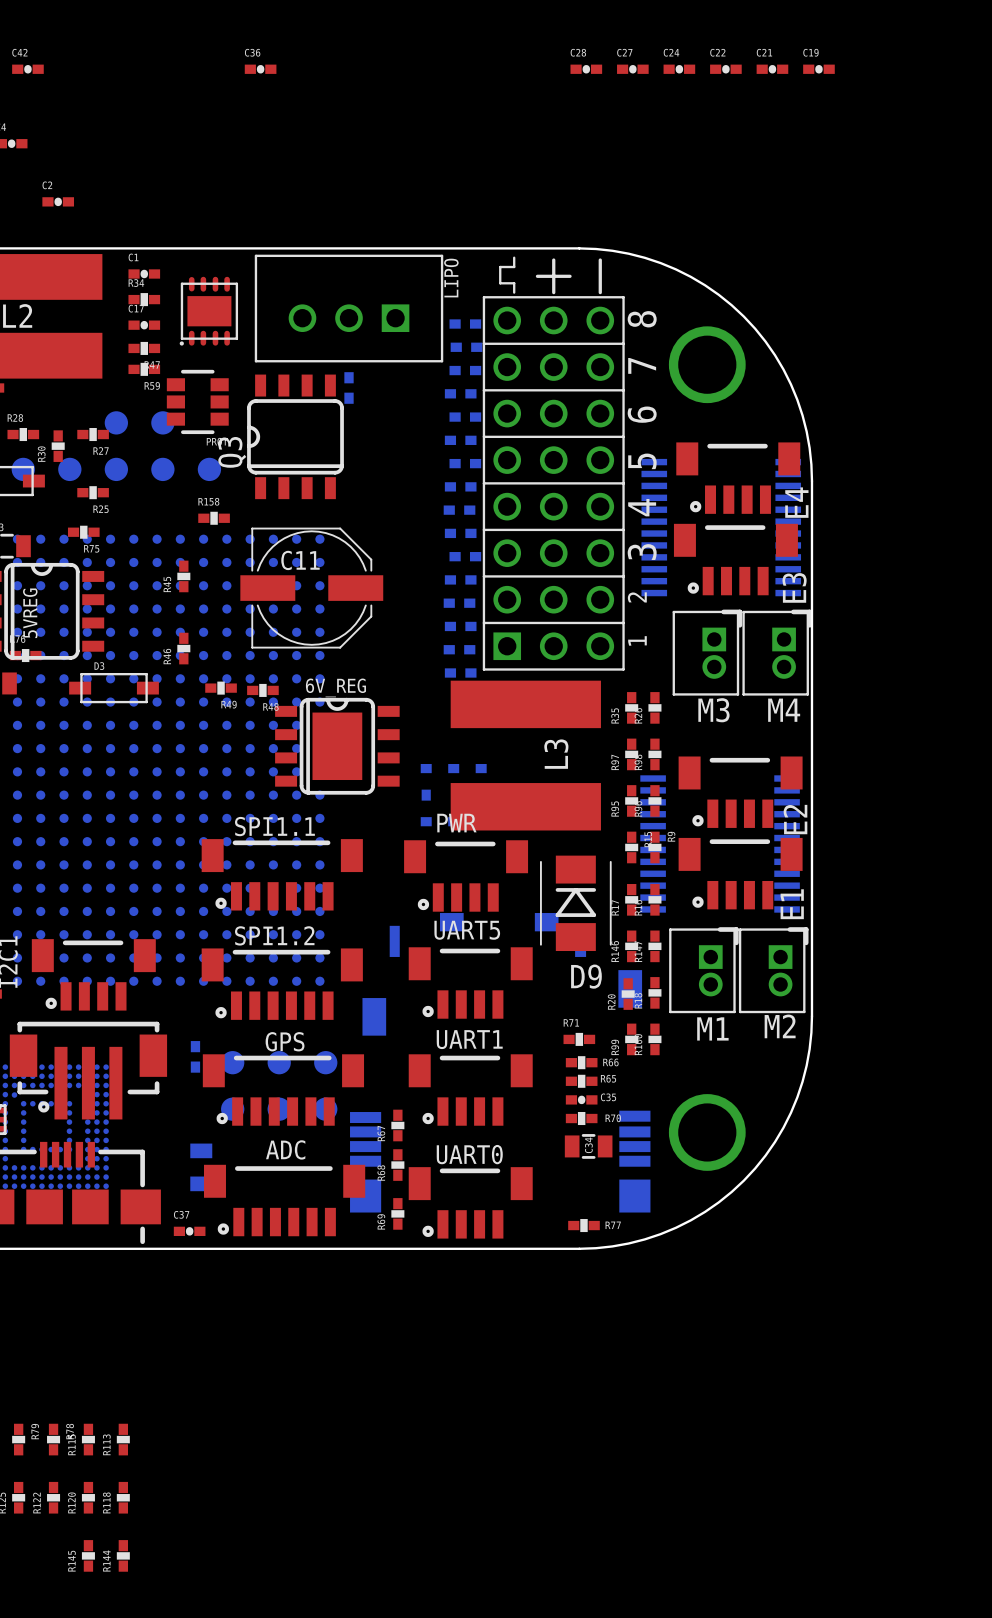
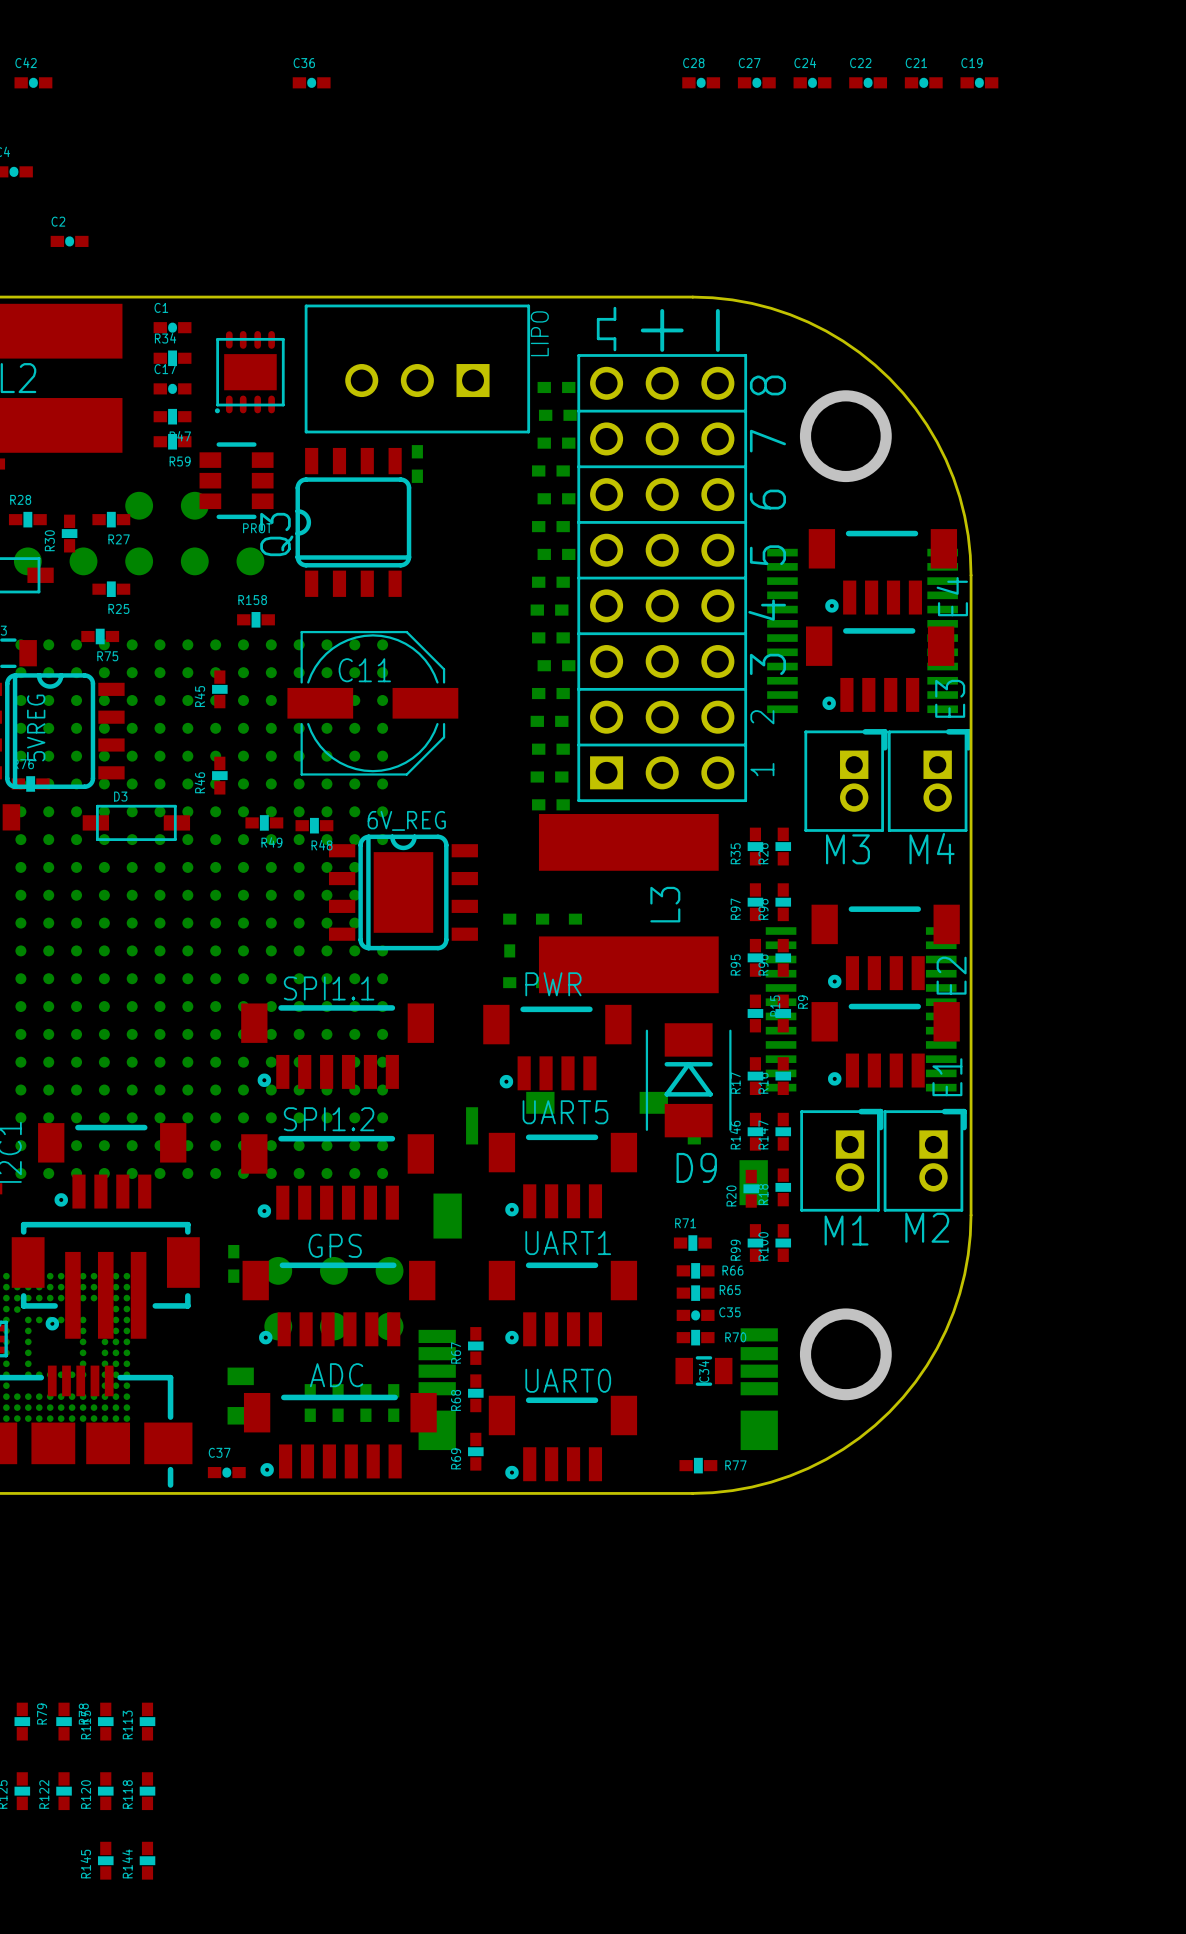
part: none -> (310, 1403)
part: none -> (338, 1403)
part: none -> (365, 1403)
part: none -> (393, 1403)

